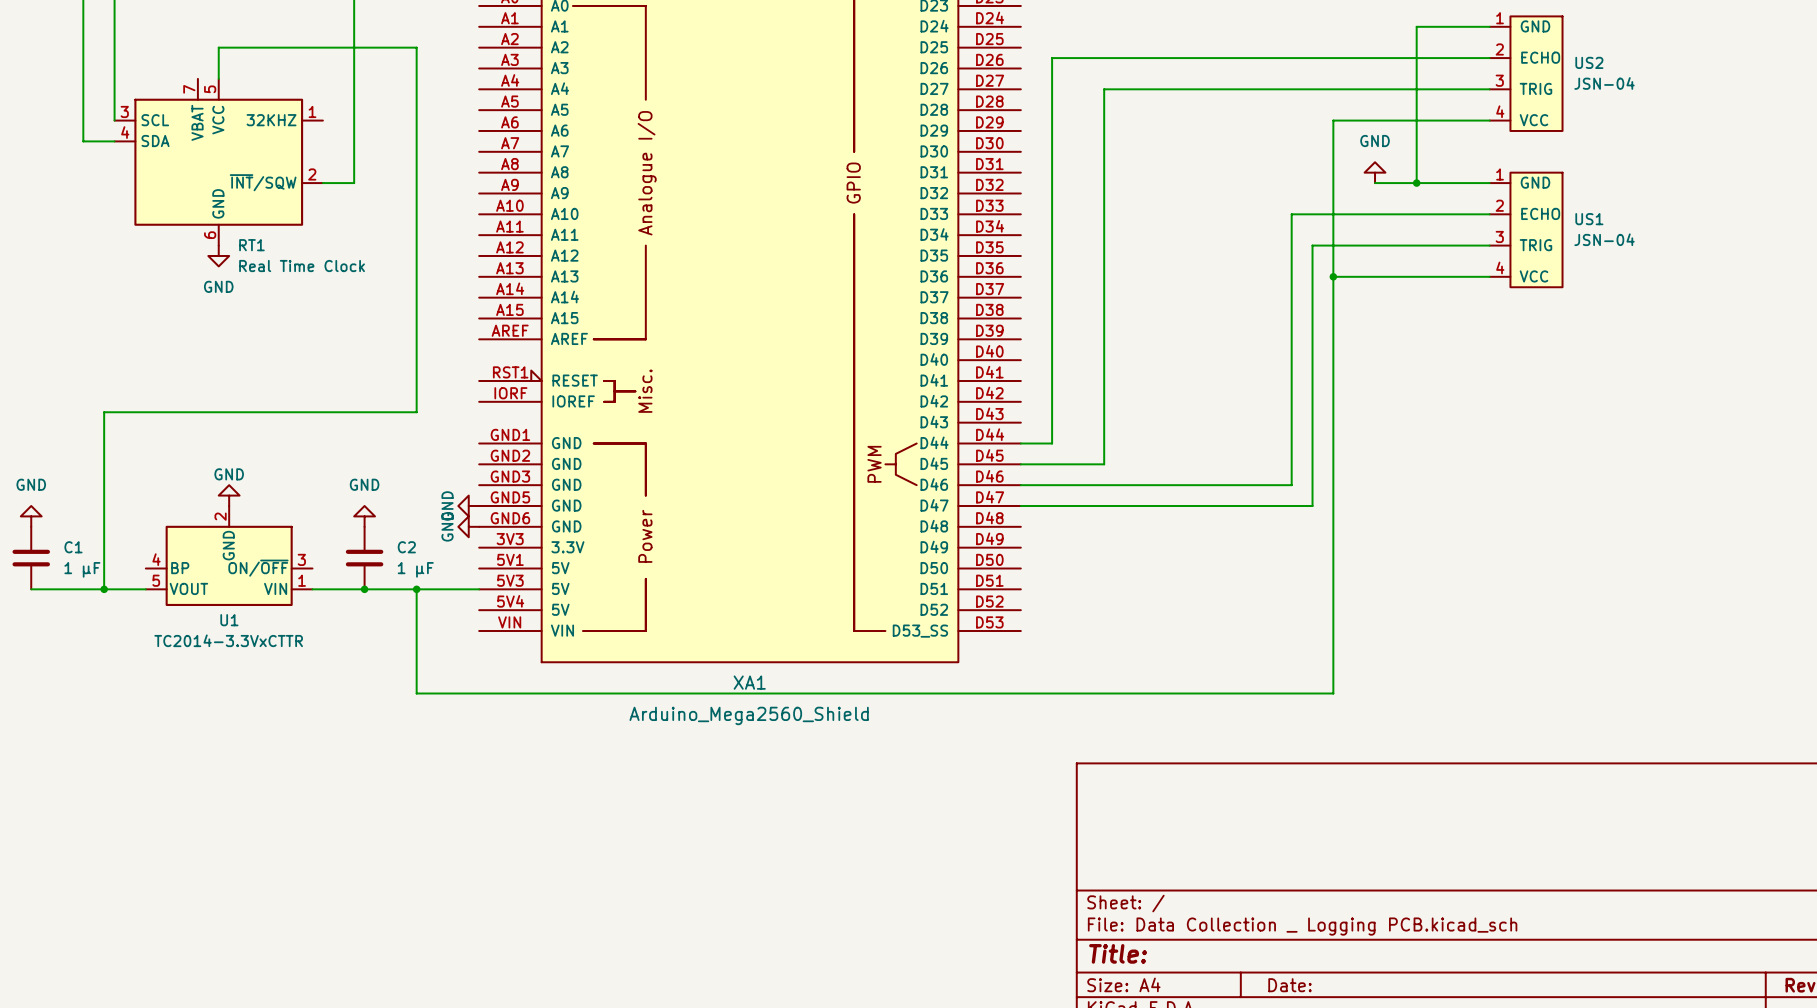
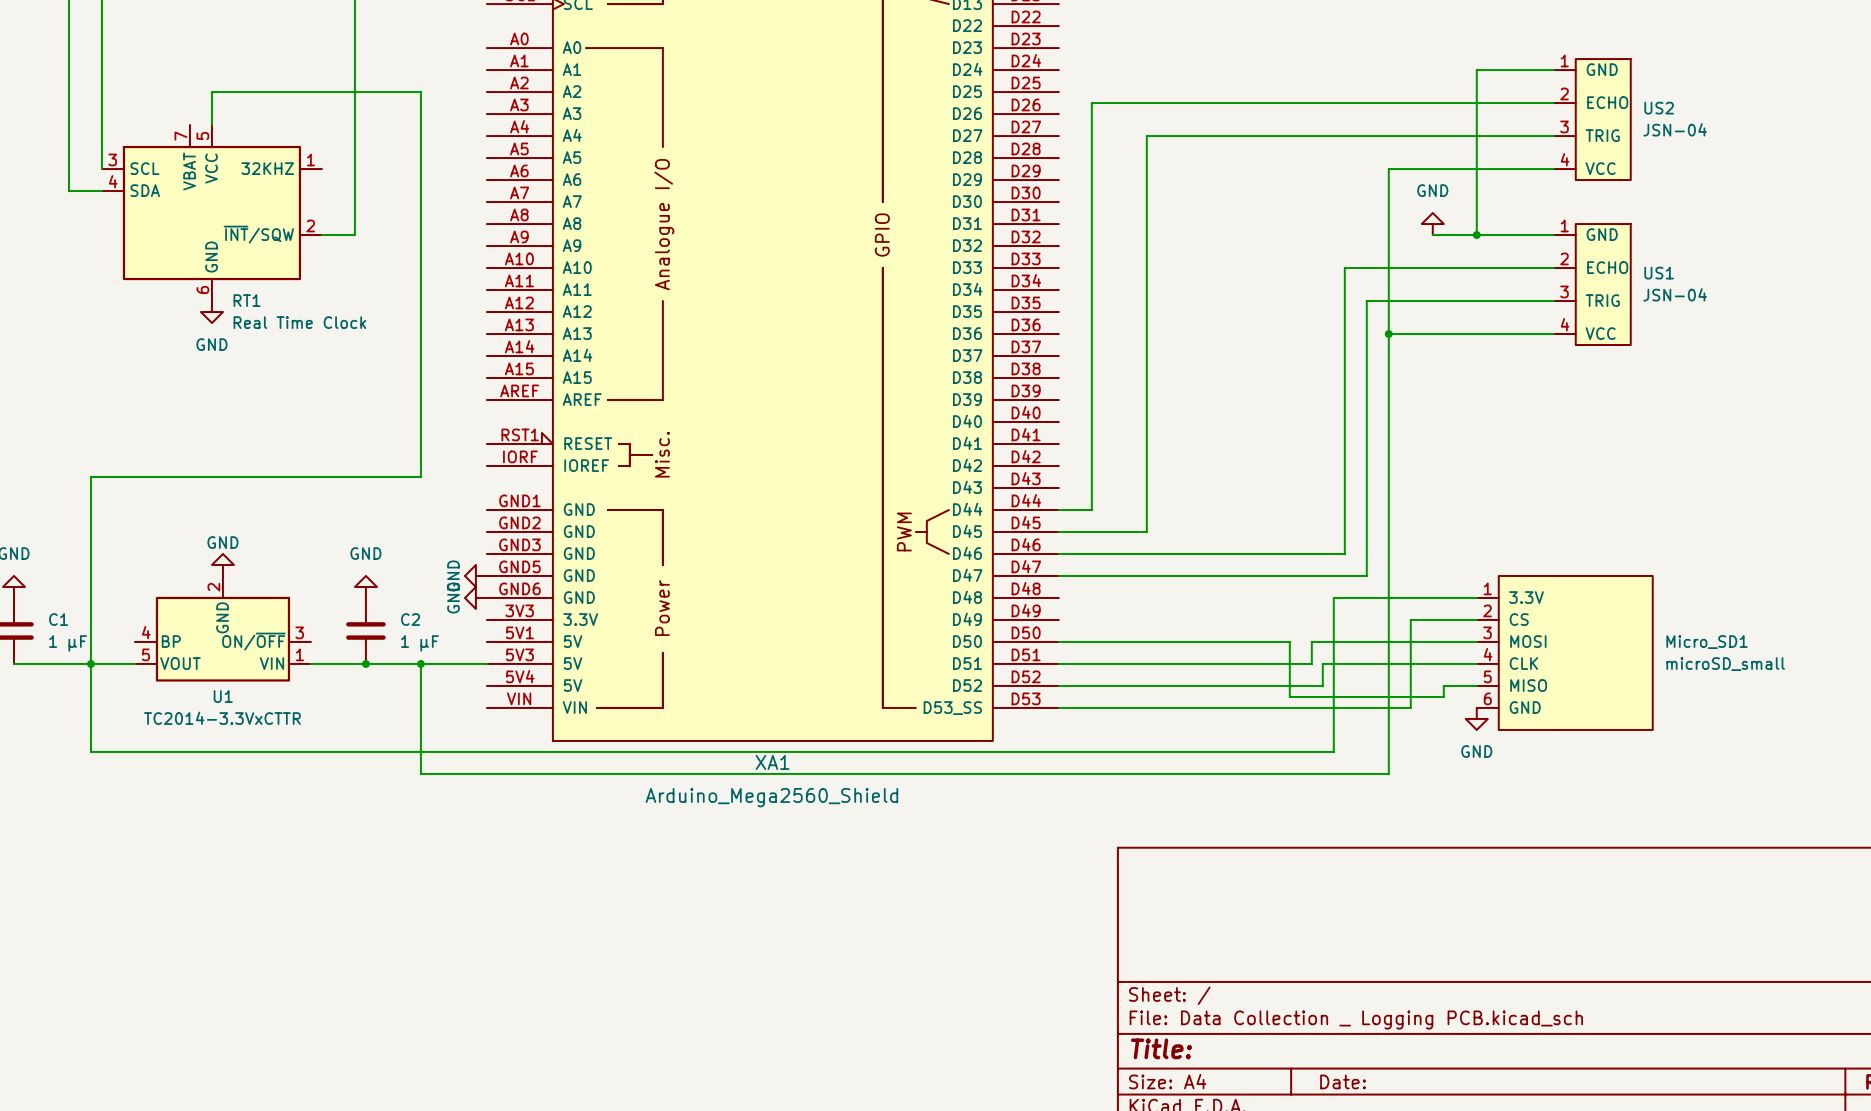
wire: none -> (1476, 597) (1333, 597) (1333, 751) (90, 751) (90, 663)
wire: none -> (1476, 619) (1410, 619) (1410, 707) (1058, 707)
wire: none -> (1058, 641) (1289, 641) (1289, 696) (1443, 696) (1443, 685) (1476, 685)
wire: none -> (1476, 641) (1311, 641) (1311, 663) (1058, 663)
Micro_SD1: none -> microSD_small (1564, 652)
wire: none -> (1476, 663) (1322, 663) (1322, 685) (1058, 685)
power symbol: none -> GND (1476, 718)

